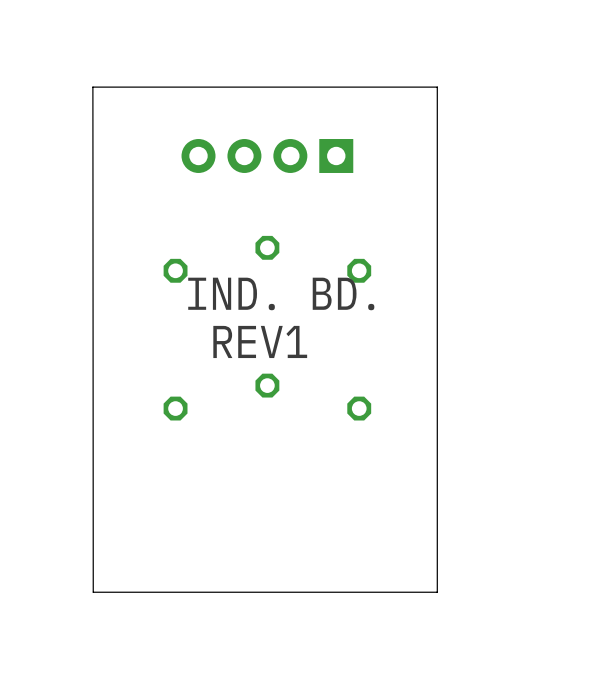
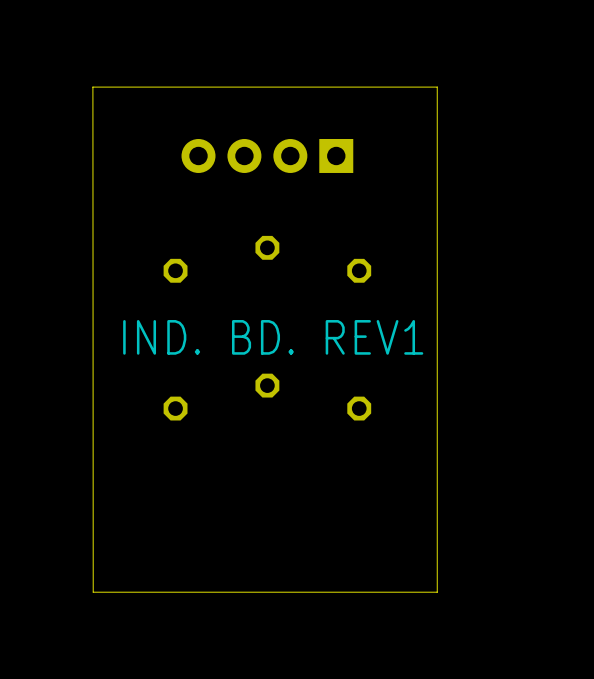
text: IND. BD. (281, 293) -> IND. BD. REV1 (273, 337)
text: REV1 (260, 341) -> none

